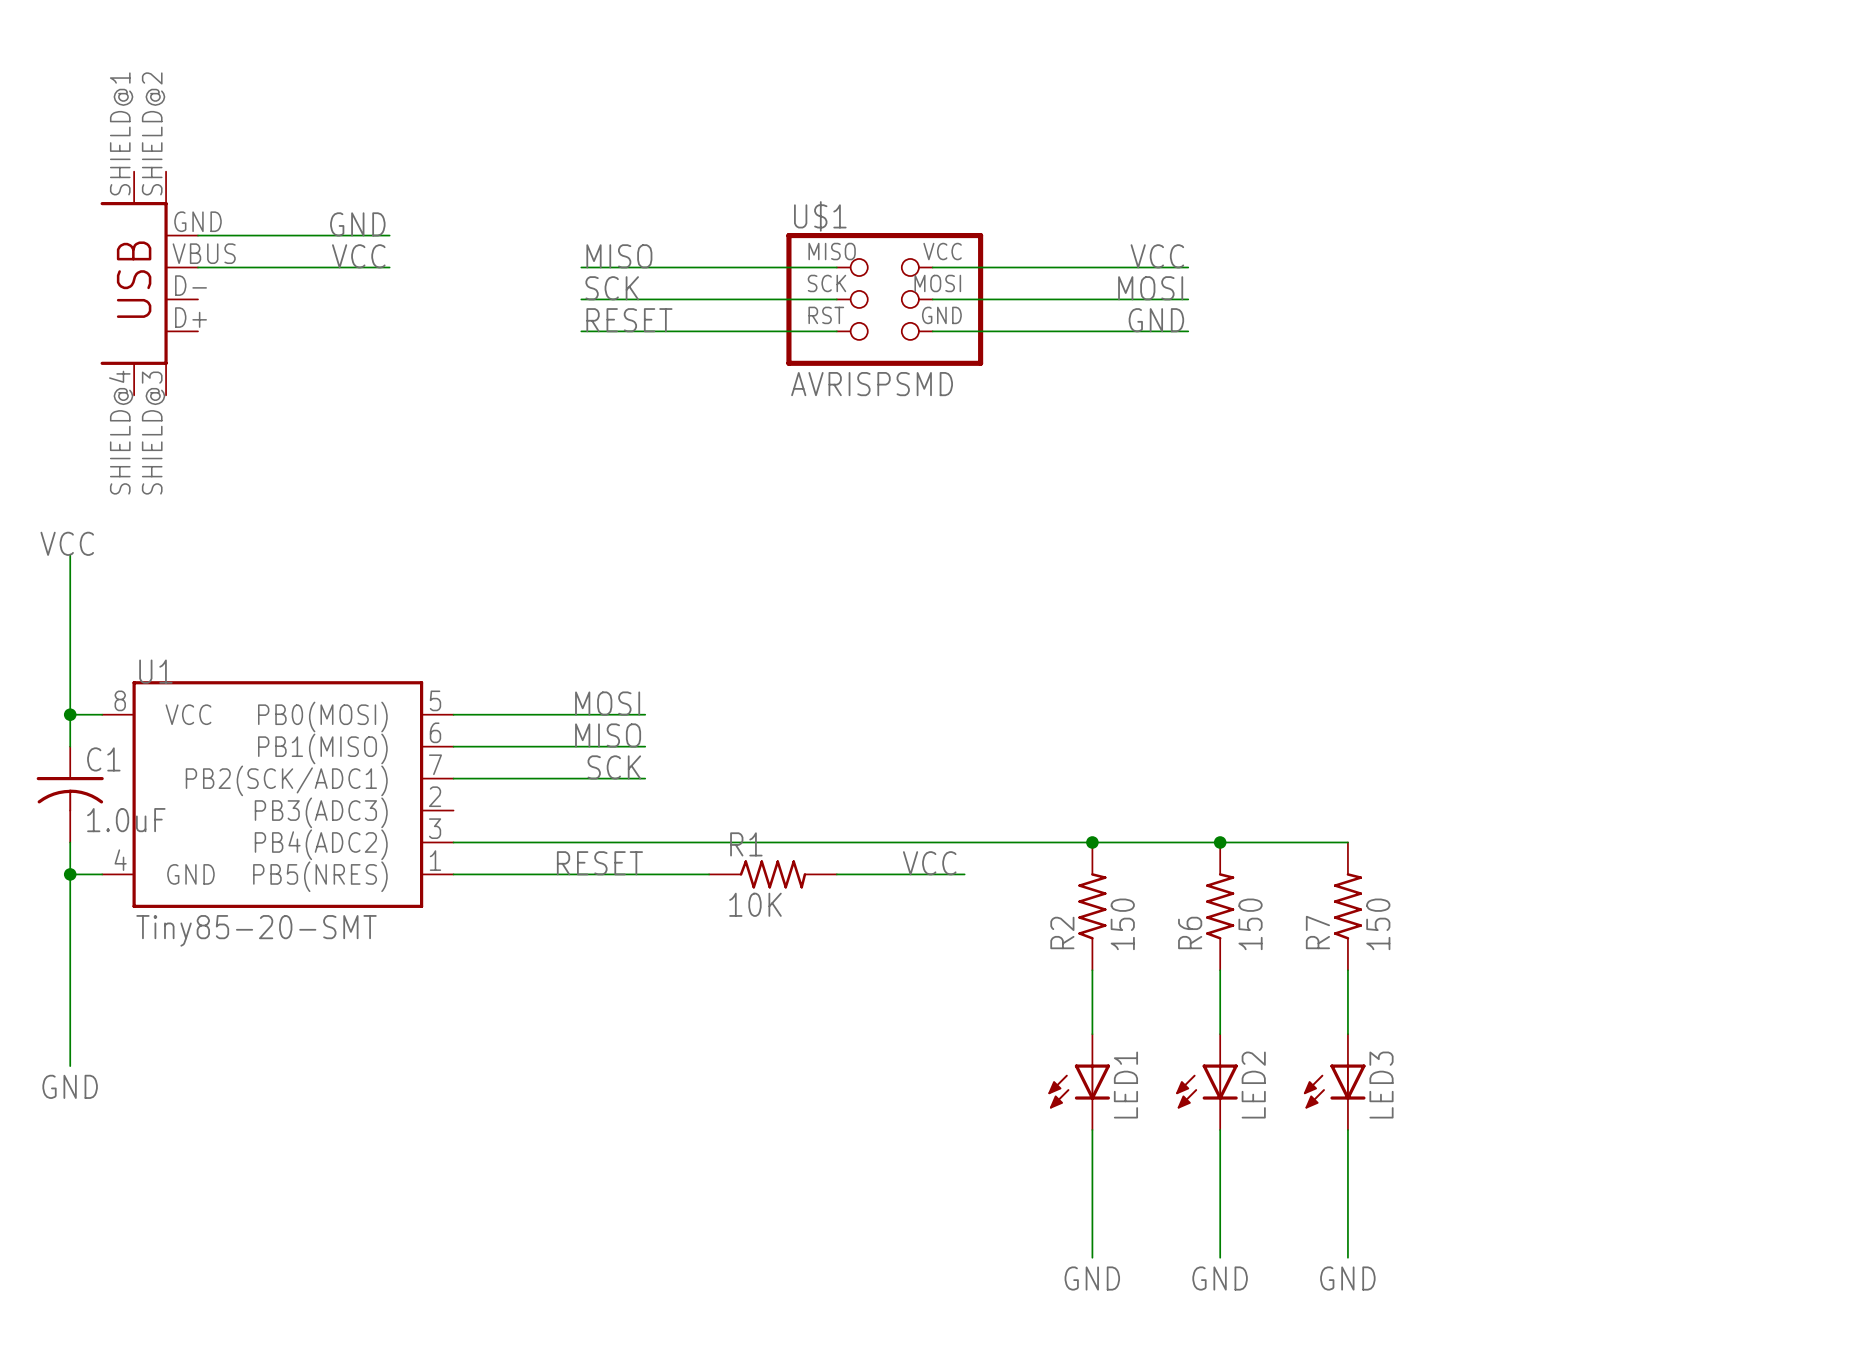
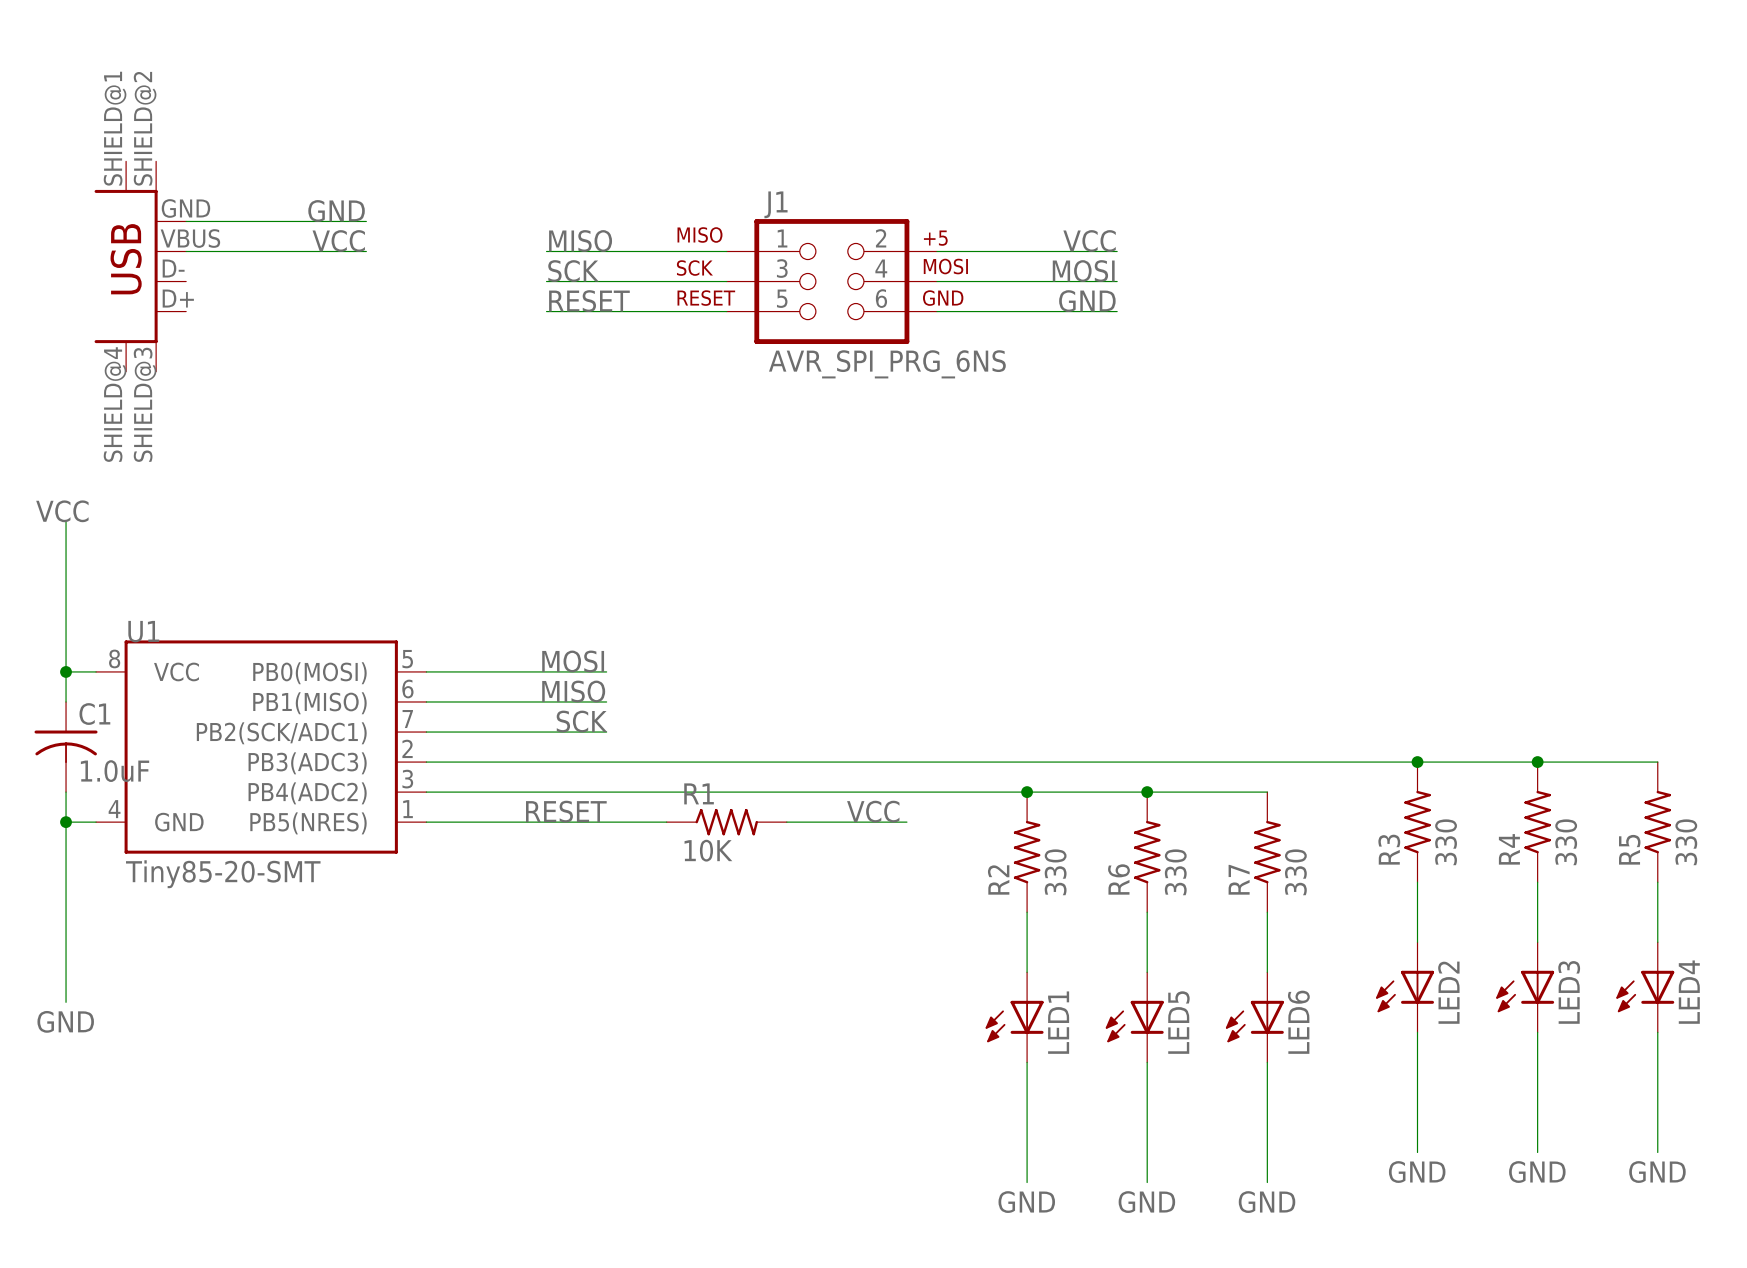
U$1: AVRISPSMD (884, 299) -> none
J1: none -> AVR_SPI_PRG_6NS (831, 281)
wire: none -> (426, 762) (1657, 762)
junction: none -> (1417, 762)
junction: none -> (1537, 762)
R3: none -> 330 (1417, 822)
R4: none -> 330 (1537, 822)
R5: none -> 330 (1657, 822)
R2 value: 150 (1122, 924) -> 330 (1055, 872)
R6 value: 150 (1250, 924) -> 330 (1175, 872)
R7 value: 150 (1378, 924) -> 330 (1295, 872)
wire: none -> (1417, 882) (1417, 942)
wire: none -> (1537, 882) (1537, 942)
wire: none -> (1657, 882) (1657, 942)
LED2: none -> (1405, 987)
LED3: none -> (1525, 987)
LED4: none -> (1645, 987)
LED2 name: LED2 (1253, 1085) -> LED5 (1178, 1022)
LED3 name: LED3 (1381, 1085) -> LED6 (1298, 1022)
wire: none -> (1417, 1032) (1417, 1152)
wire: none -> (1537, 1032) (1537, 1152)
wire: none -> (1657, 1032) (1657, 1152)
label: none -> GND (1417, 1172)
label: none -> GND (1537, 1172)
label: none -> GND (1657, 1172)

